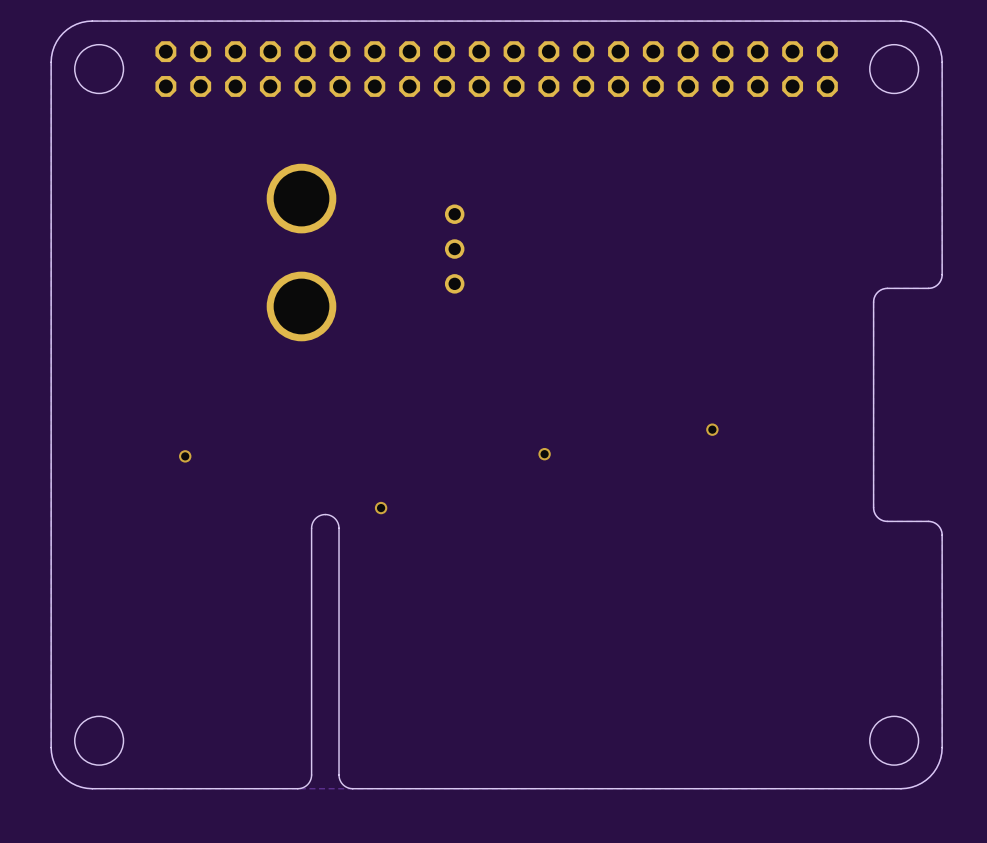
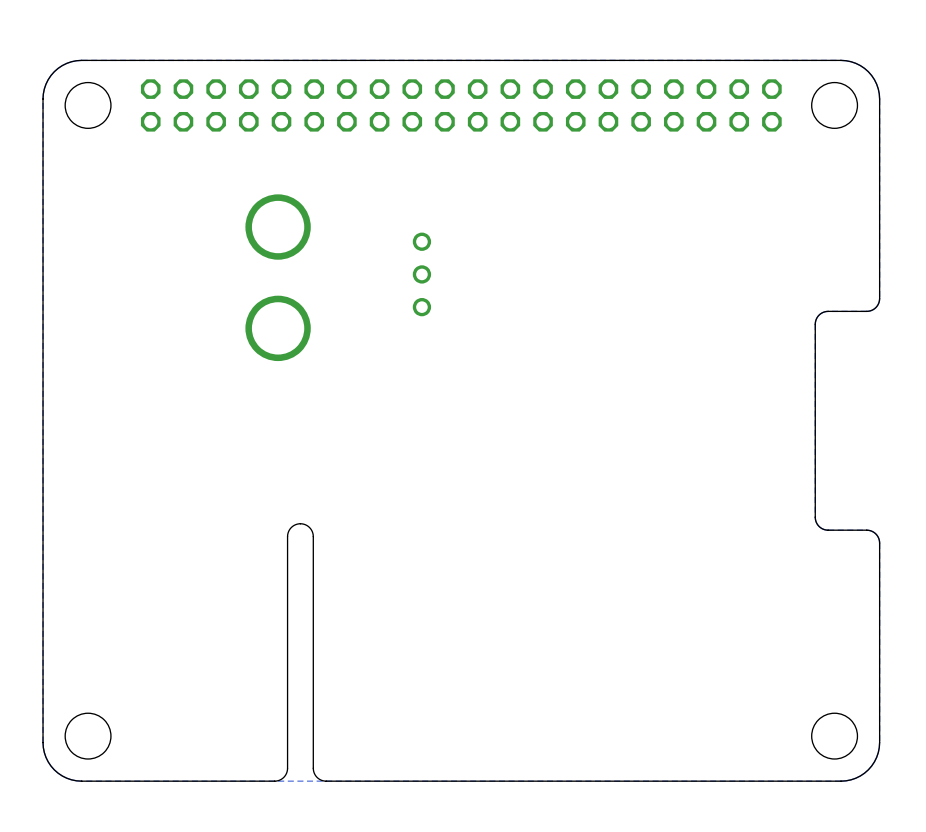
via: (712, 429) -> none
via: (544, 454) -> none
via: (185, 456) -> none
via: (381, 508) -> none

